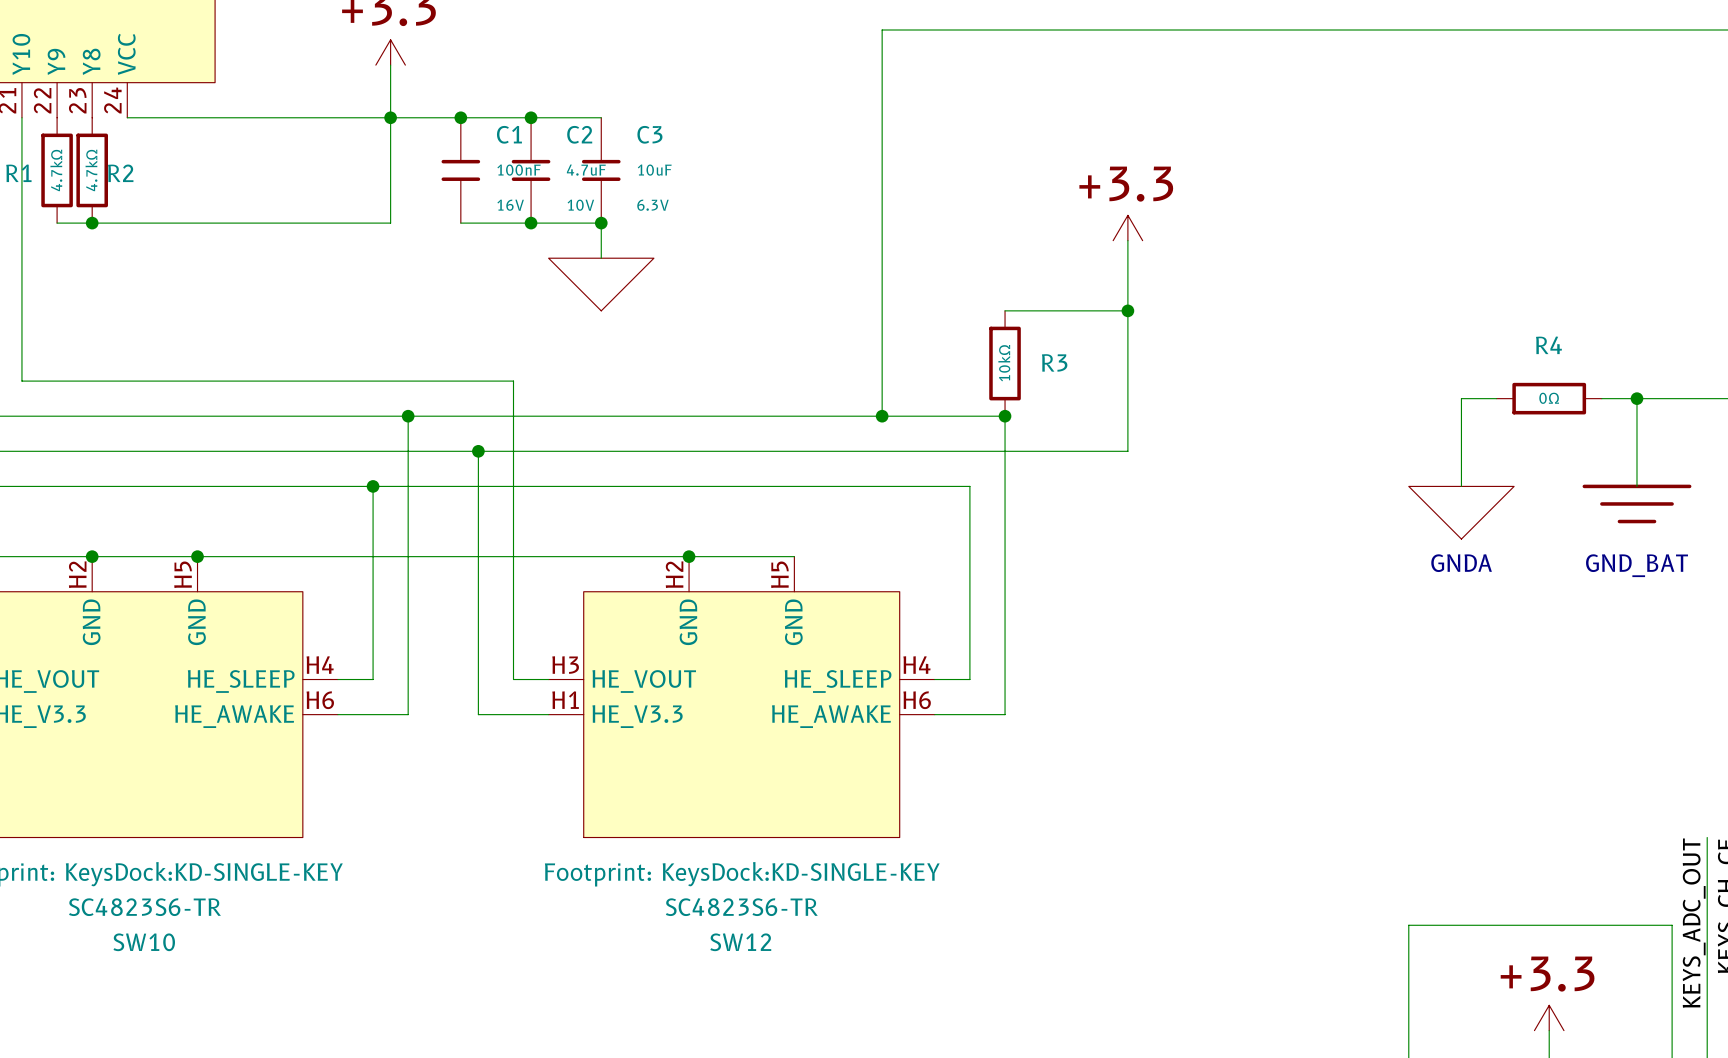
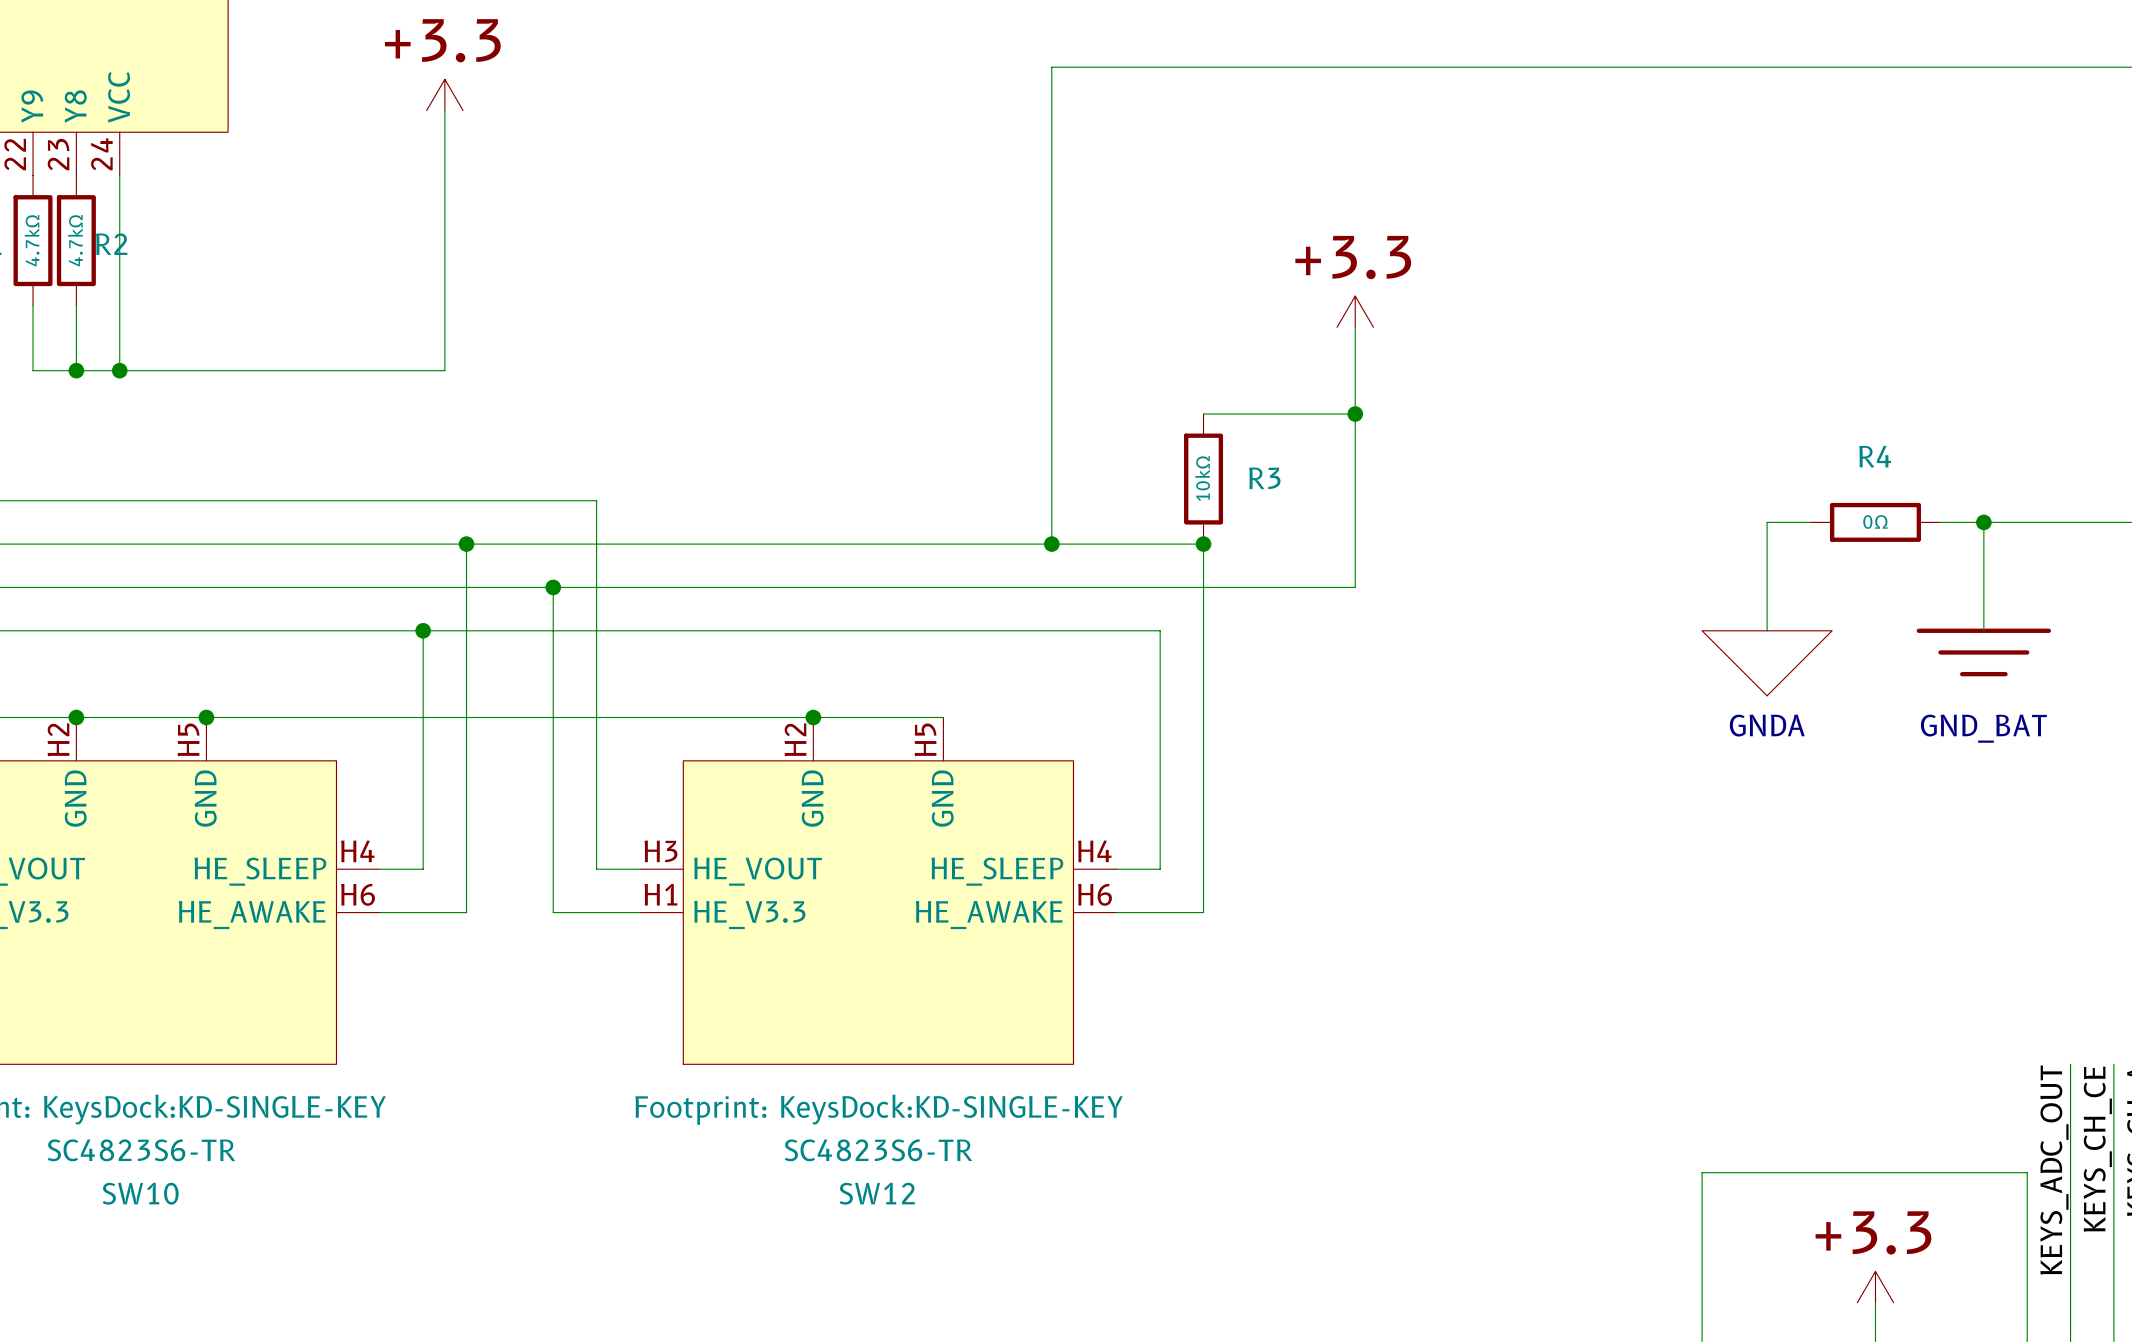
wire: (127, 117) (601, 117) -> (119, 175) (119, 370)
junction: (390, 117) -> none
junction: (460, 117) -> none
junction: (531, 117) -> none
C1: 100nF (460, 170) -> none
C2: 4.7uF (531, 170) -> none
C3: 10uF (601, 170) -> none
wire: (57, 223) (390, 223) -> (33, 305) (33, 370) (444, 370) (444, 305)
wire: none -> (76, 305) (76, 370)
junction: (92, 223) -> none
wire: (460, 223) (601, 223) (601, 258) -> none
junction: (531, 223) -> none
junction: (601, 223) -> none
junction: none -> (76, 370)
junction: none -> (119, 370)
power symbol: (601, 284) -> none

